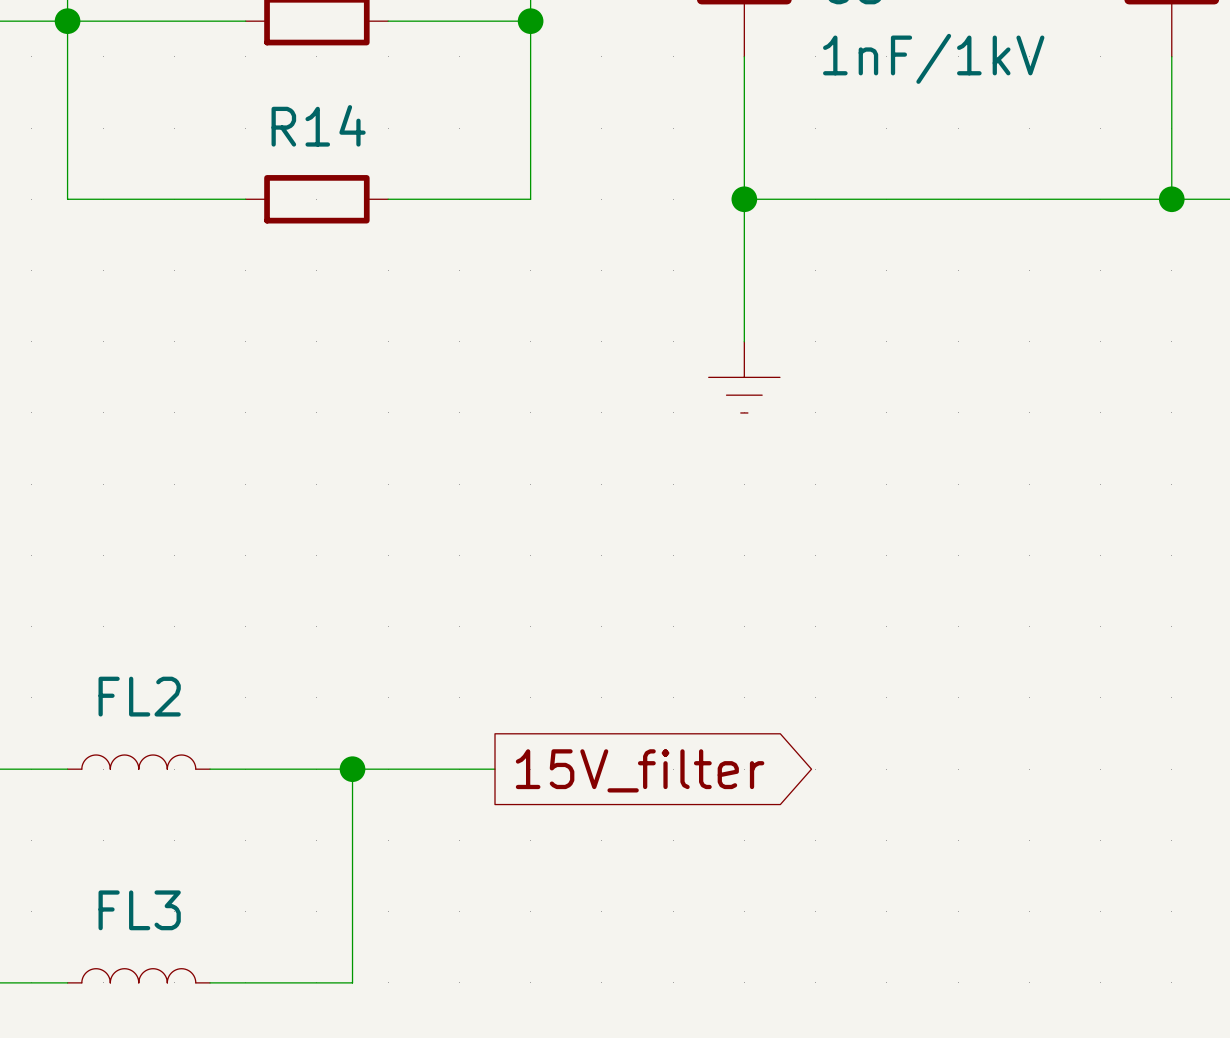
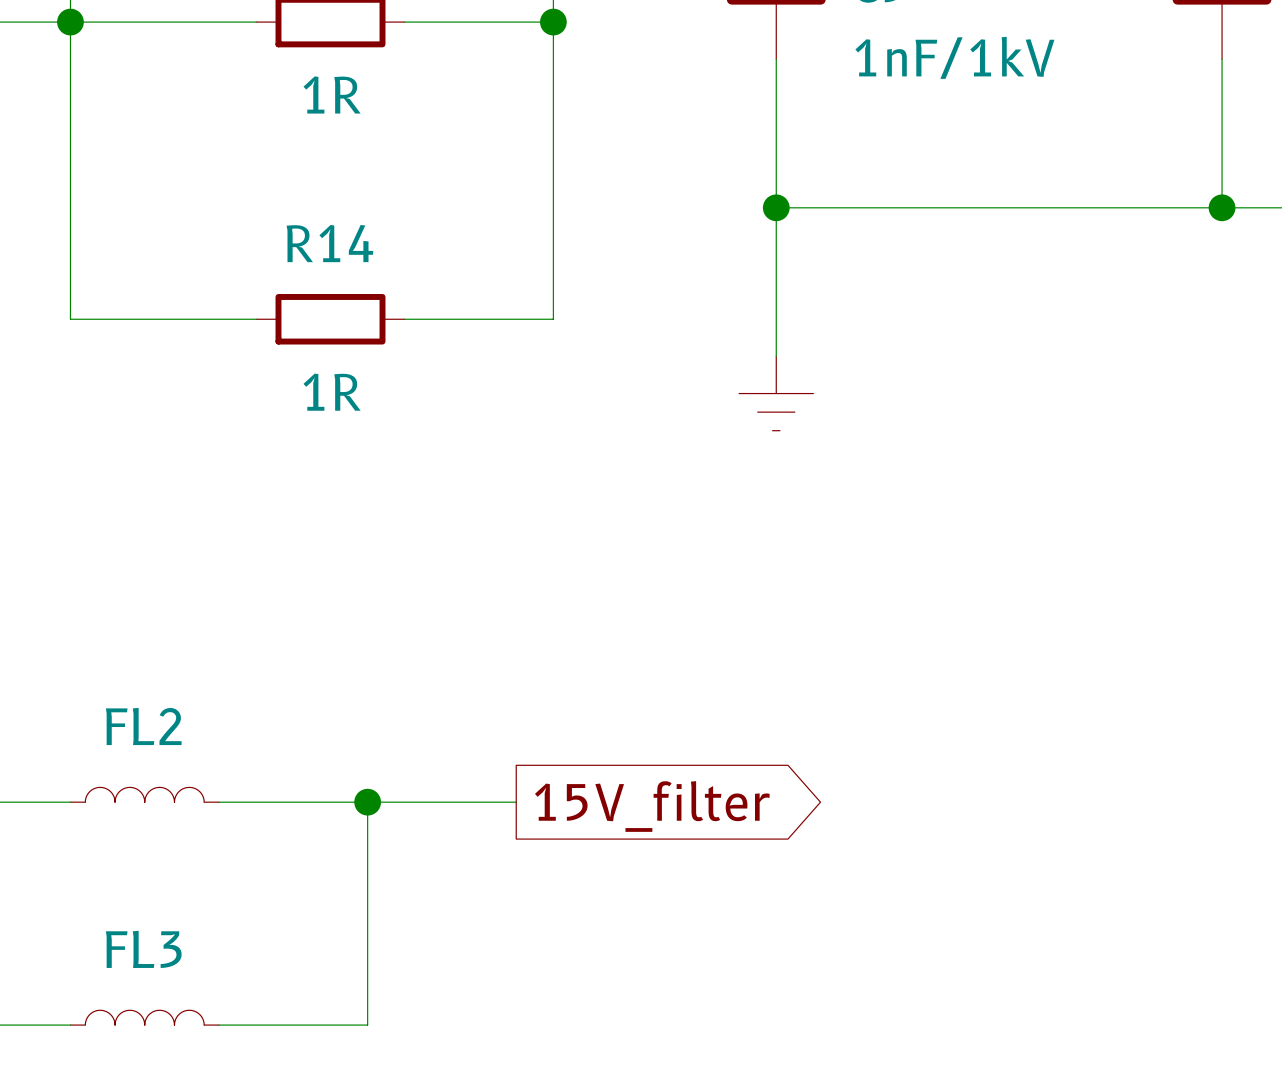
part value: none -> 1R (332, 94)
wire: (67, 199) (245, 199) -> (70, 207) (70, 319) (256, 319)
R14 position: (316, 199) -> (330, 319)
wire: (388, 199) (530, 199) -> (404, 319) (553, 319) (553, 207)
R14 value: none -> 1R (332, 392)

